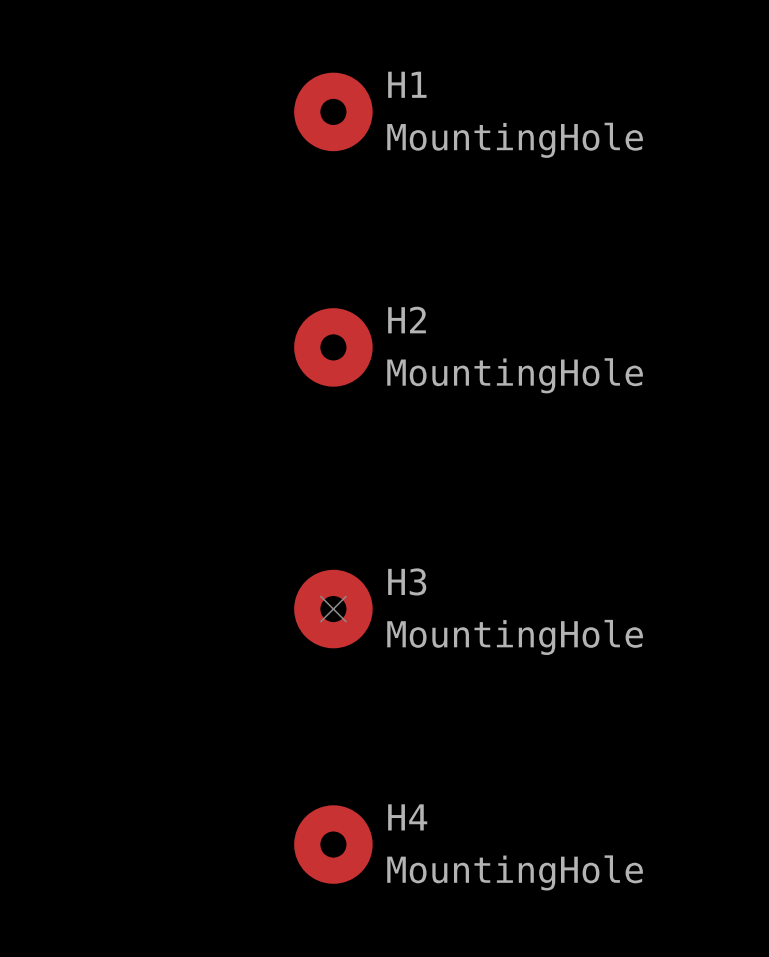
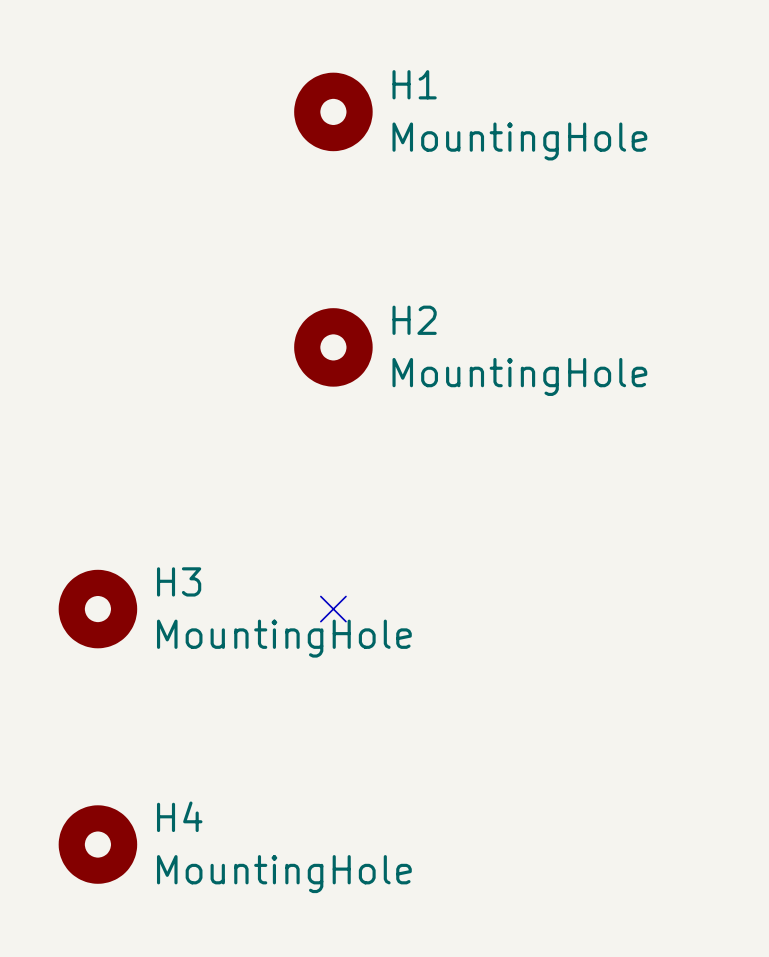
H3 position: (333, 609) -> (97, 609)
H4 position: (333, 844) -> (97, 844)

